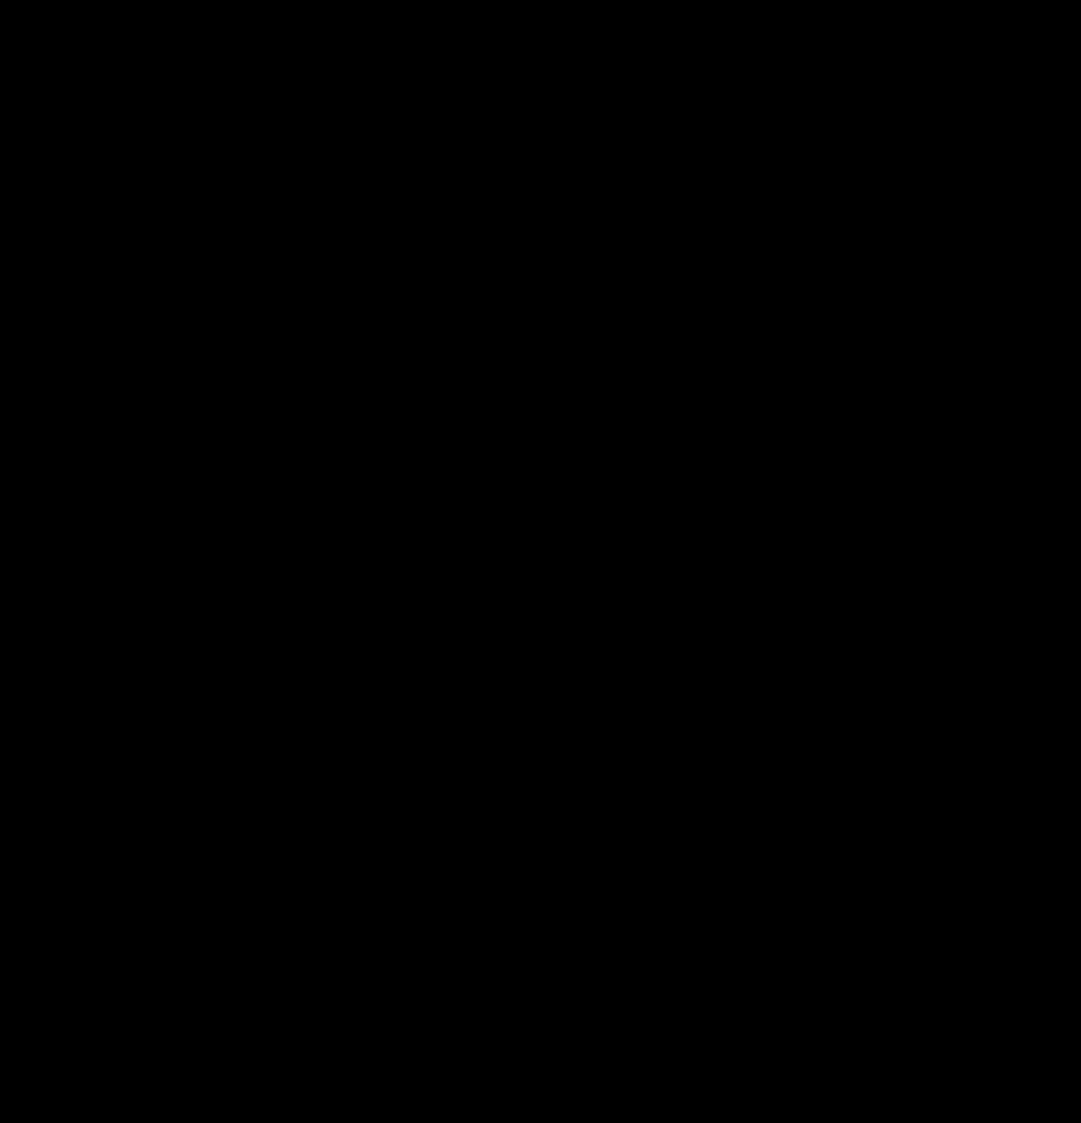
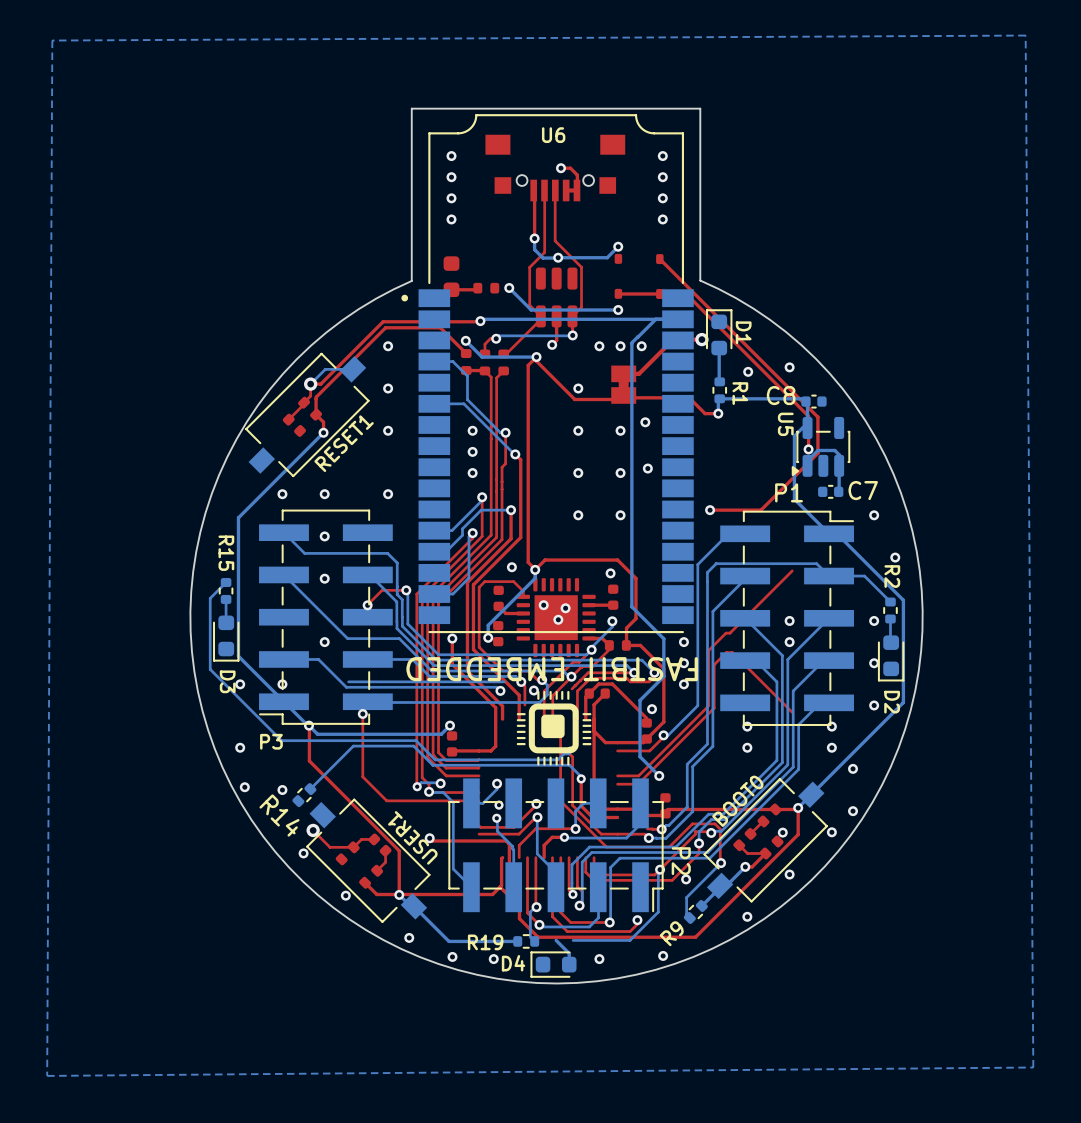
bottom zone outline: none -> (1025, 35) (1033, 1067) (47, 1075) (52, 40) (1025, 35)
via: none -> (451, 156)
via: none -> (662, 156)
part: none -> (555, 168)
top track: none -> (560, 168) (570, 168) (577, 175) (576, 190) (566, 190)
via: none -> (560, 168)
via: none -> (451, 177)
via: none -> (662, 177)
top track: none -> (533, 190) (534, 238)
top track: none -> (544, 190) (544, 252) (529, 267) (529, 305) (540, 316) (540, 319) (503, 355)
top track: none -> (555, 190) (555, 240) (581, 267) (581, 307) (572, 316) (572, 335)
via: none -> (451, 198)
via: none -> (662, 198)
via: none -> (451, 219)
via: none -> (662, 219)
bottom track: none -> (534, 238) (534, 249) (543, 258) (607, 257) (618, 246)
via: none -> (534, 238)
via: none -> (618, 246)
via: none -> (558, 257)
top track: none -> (659, 259) (817, 417) (817, 453) (761, 510) (710, 510)
part: none -> (451, 276)
part: none -> (618, 276)
part: none -> (659, 276)
board edge: none -> (411, 280) (358, 309) (326, 332) (296, 359) (257, 405) (236, 439) (219, 475) (200, 532) (193, 571) (190, 611) (191, 651) (197, 691) (214, 749) (231, 785) (251, 820) (288, 867) (333, 907) (366, 930) (401, 949) (438, 964) (477, 974) (536, 982) (577, 982) (616, 978) (655, 969) (693, 956) (747, 929) (780, 907) (810, 880) (850, 835) (872, 802) (890, 766) (905, 729) (915, 690) (921, 650) (922, 610) (919, 570) (912, 531) (893, 474) (876, 438) (854, 404) (815, 358) (770, 319) (736, 298) (700, 280) (700, 108) (411, 108) (411, 280)
top track: none -> (477, 288) (476, 289) (451, 289)
part: none -> (486, 288)
bottom track: none -> (509, 288) (531, 309) (618, 309)
via: none -> (509, 288)
top track: none -> (618, 293) (686, 293) (808, 416) (808, 449)
part: none -> (556, 297)
via: none -> (618, 309)
top track: none -> (556, 316) (556, 340) (552, 344)
bottom track: none -> (655, 319) (631, 343) (631, 606) (663, 638) (663, 676) (640, 700) (640, 756) (659, 775)
bottom track: none -> (677, 319) (482, 319) (480, 321)
top track: none -> (480, 321) (383, 321) (320, 384) (310, 384) (310, 396) (288, 419)
via: none -> (480, 321)
D1: none -> (719, 332)
bottom track: none -> (572, 335) (499, 335) (496, 338)
via: none -> (572, 335)
top track: none -> (496, 338) (490, 338) (484, 344) (484, 353)
via: none -> (496, 338)
top track: none -> (701, 339) (673, 339) (639, 373) (623, 373)
via: none -> (701, 339)
bottom track: none -> (465, 340) (482, 357) (536, 357)
via: none -> (465, 340)
via: none -> (552, 344)
via: none -> (388, 346)
via: none -> (599, 346)
via: none -> (620, 346)
via: none -> (641, 346)
bottom track: none -> (719, 348) (719, 381)
top track: none -> (466, 353) (440, 327) (385, 327) (316, 397) (316, 414) (323, 422) (323, 432)
via: none -> (536, 357)
bottom track: none -> (434, 361) (452, 361) (467, 376) (467, 399) (500, 432) (505, 432)
part: none -> (466, 362)
part: none -> (484, 362)
part: none -> (503, 362)
via: none -> (789, 367)
bottom track: none -> (352, 369) (325, 369) (310, 384)
top track: none -> (466, 370) (484, 370) (491, 377) (491, 535) (427, 598) (428, 757)
top track: none -> (503, 370) (496, 378) (496, 537) (433, 600) (433, 755)
via: none -> (748, 371)
U6: none -> (547, 373)
via: none -> (310, 384)
part: none -> (623, 384)
via: none -> (388, 388)
via: none -> (578, 388)
R1: none -> (719, 390)
C8: none -> (813, 401)
bottom track: none -> (434, 403) (463, 403) (515, 454)
part: none -> (310, 408)
top track: none -> (718, 413) (705, 413) (689, 397) (574, 399) (536, 361) (536, 357) (528, 365) (528, 562) (535, 569) (535, 573)
bottom track: none -> (718, 413) (719, 398) (803, 398) (807, 403) (807, 427) (802, 427) (794, 436) (794, 499) (829, 533) (836, 533) (903, 600) (903, 702) (798, 807)
via: none -> (718, 413)
RESET1: none -> (307, 414)
via: none -> (645, 422)
part: none -> (294, 425)
via: none -> (388, 430)
via: none -> (472, 430)
via: none -> (578, 430)
via: none -> (620, 430)
bottom track: none -> (323, 432) (238, 517) (238, 656) (317, 734) (441, 734) (450, 725)
via: none -> (323, 432)
top track: none -> (505, 432) (505, 463) (502, 467) (502, 539) (438, 603) (438, 752) (446, 760) (479, 759)
via: none -> (505, 432)
U5: none -> (821, 446)
via: none -> (808, 449)
via: none -> (472, 451)
top track: none -> (515, 454) (520, 459) (520, 537) (473, 584) (473, 649) (519, 695) (519, 719)
via: none -> (515, 454)
bottom track: none -> (807, 460) (817, 450) (834, 450) (839, 454) (838, 491)
via: none -> (647, 468)
via: none -> (472, 473)
via: none -> (578, 473)
via: none -> (620, 473)
C7: none -> (830, 491)
via: none -> (282, 494)
via: none -> (324, 494)
via: none -> (388, 494)
top track: none -> (482, 497) (482, 536) (422, 596) (422, 777) (429, 784) (429, 792) (479, 792)
bottom track: none -> (482, 497) (482, 500) (451, 530) (434, 530)
via: none -> (482, 497)
top track: none -> (511, 510) (511, 538) (467, 582) (467, 671) (502, 706) (502, 719)
bottom track: none -> (511, 510) (481, 510) (462, 528) (462, 535) (446, 551) (434, 551)
via: none -> (511, 510)
via: none -> (710, 510)
via: none -> (578, 515)
via: none -> (620, 515)
via: none -> (874, 515)
bottom track: none -> (283, 532) (304, 553) (387, 553) (397, 562) (397, 594) (402, 599) (402, 617)
top track: none -> (472, 533) (472, 538) (416, 594) (417, 786)
bottom track: none -> (472, 533) (469, 536) (469, 577) (452, 594) (434, 594)
via: none -> (472, 533)
bottom track: none -> (745, 533) (728, 533) (697, 564) (697, 705) (668, 735) (663, 735)
via: none -> (324, 536)
via: none -> (895, 557)
via: none -> (511, 567)
top track: none -> (535, 569) (545, 560) (617, 560) (635, 578) (635, 618) (626, 628) (626, 645)
bottom track: none -> (535, 569) (535, 578) (488, 625) (488, 637)
via: none -> (535, 569)
top track: none -> (792, 570) (730, 633) (726, 633) (708, 650) (708, 705) (638, 775) (617, 775)
via: none -> (610, 573)
bottom track: none -> (283, 574) (347, 638) (399, 638) (431, 671) (563, 671) (571, 676)
bottom track: none -> (367, 574) (396, 601) (396, 621)
bottom track: none -> (745, 576) (745, 579) (712, 611) (712, 746) (692, 766) (692, 811) (665, 838) (648, 838)
via: none -> (324, 578)
bottom track: none -> (707, 581) (707, 744) (687, 764) (687, 806) (668, 825) (661, 829)
bottom track: none -> (707, 581) (707, 572) (716, 563) (816, 563) (829, 576) (864, 576) (890, 602)
bottom track: none -> (226, 582) (210, 598) (210, 669) (281, 740) (416, 740) (435, 759) (558, 759) (563, 753) (569, 753)
R15: none -> (226, 590)
top track: none -> (406, 590) (382, 590) (367, 605)
bottom track: none -> (406, 590) (407, 624) (438, 654) (586, 654) (612, 626) (612, 621)
via: none -> (406, 590)
top track: none -> (523, 596) (523, 591) (513, 581) (484, 581) (479, 587) (479, 647) (502, 670) (528, 670) (537, 680) (542, 680)
part: none -> (613, 597)
part: none -> (498, 598)
bottom track: none -> (226, 599) (226, 622)
via: none -> (367, 605)
via: none -> (543, 605)
top track: none -> (613, 605) (589, 605)
top track: none -> (498, 606) (505, 613) (523, 613)
via: none -> (565, 608)
R2: none -> (890, 610)
P3: none -> (325, 617)
bottom track: none -> (402, 617) (402, 626) (436, 660) (641, 660) (654, 672)
part: none -> (556, 617)
bottom track: none -> (745, 618) (782, 655) (782, 762) (725, 819) (711, 819) (699, 831) (699, 843)
P1: none -> (787, 618)
bottom track: none -> (829, 618) (787, 659) (787, 764) (721, 831) (711, 832)
bottom track: none -> (890, 618) (891, 642)
via: none -> (558, 619)
via: none -> (789, 620)
via: none -> (874, 620)
bottom track: none -> (396, 621) (396, 628) (434, 665) (626, 665) (634, 672)
via: none -> (612, 621)
part: none -> (498, 633)
via: none -> (488, 637)
D3: none -> (226, 638)
top track: none -> (452, 638) (452, 664) (495, 707) (495, 746) (490, 750) (452, 751)
via: none -> (452, 638)
top track: none -> (589, 638) (602, 638) (609, 645) (609, 649) (592, 666) (580, 667) (552, 695) (552, 718)
via: none -> (324, 642)
via: none -> (683, 642)
via: none -> (789, 642)
part: none -> (617, 645)
top track: none -> (626, 645) (640, 645) (663, 668) (663, 721) (646, 739)
top track: none -> (591, 649) (579, 662) (573, 662) (544, 691) (544, 719)
via: none -> (591, 649)
D2: none -> (891, 658)
bottom track: none -> (283, 659) (318, 659) (346, 687) (496, 687) (500, 690)
bottom track: none -> (367, 659) (412, 659) (429, 676) (515, 676) (521, 681)
bottom track: none -> (745, 660) (755, 660) (776, 681) (776, 760) (723, 814) (708, 814) (675, 847) (589, 847) (571, 864) (572, 894)
bottom track: none -> (829, 660) (823, 660) (793, 691) (793, 767) (707, 852) (591, 852) (582, 862) (582, 903) (579, 905)
via: none -> (683, 663)
via: none -> (874, 663)
text: none -> FASTBIT EMBEDDED (552, 669)
top track: none -> (634, 672) (588, 672) (572, 688)
via: none -> (634, 672)
top track: none -> (654, 672) (654, 676) (649, 681) (630, 681) (626, 678) (589, 678) (577, 691) (577, 719)
via: none -> (654, 672)
via: none -> (571, 676)
bottom track: none -> (542, 680) (547, 685) (547, 694) (539, 702) (367, 701) (362, 706) (362, 713)
via: none -> (542, 680)
bottom track: none -> (504, 681) (348, 681)
via: none -> (521, 681)
via: none -> (240, 684)
via: none -> (282, 684)
via: none -> (683, 684)
top track: none -> (524, 685) (524, 705)
via: none -> (500, 690)
drawing: none -> [516, 690, 592, 766]
via: none -> (533, 690)
part: none -> (597, 693)
top track: none -> (605, 693) (594, 704) (594, 797) (605, 809) (641, 809) (647, 815) (662, 815) (668, 809) (798, 807) (798, 834) (695, 937) (538, 937) (519, 918) (519, 906) (500, 887)
bottom track: none -> (829, 702) (820, 702) (798, 724) (798, 769) (709, 858) (619, 858) (610, 867) (609, 922)
via: none -> (874, 705)
via: none -> (652, 709)
top track: none -> (792, 712) (732, 652) (726, 652) (714, 664) (714, 708) (638, 784) (617, 784)
top track: none -> (362, 713) (362, 776) (386, 800) (479, 800)
via: none -> (362, 713)
top track: none -> (646, 718) (612, 684) (598, 684) (585, 697) (585, 719)
top track: none -> (560, 719) (560, 801) (606, 847) (669, 847) (692, 823) (714, 823) (720, 829) (721, 863)
top track: none -> (308, 725) (309, 760) (399, 850) (399, 894)
via: none -> (308, 725)
via: none -> (450, 725)
via: none -> (747, 726)
via: none -> (831, 726)
top track: none -> (594, 731) (605, 742) (643, 742) (646, 739)
part: none -> (646, 731)
top track: none -> (663, 735) (649, 750) (617, 750)
via: none -> (663, 735)
part: none -> (452, 743)
via: none -> (240, 747)
via: none -> (747, 747)
via: none -> (831, 747)
top track: none -> (569, 753) (572, 756) (572, 805) (601, 834) (644, 834) (648, 838)
top track: none -> (433, 755) (446, 768) (479, 767)
top track: none -> (428, 758) (446, 775) (479, 775)
via: none -> (853, 768)
via: none -> (659, 775)
top track: none -> (581, 778) (581, 806) (592, 817) (617, 817)
bottom track: none -> (581, 778) (569, 765) (432, 765) (413, 746) (353, 746) (310, 789)
via: none -> (581, 778)
bottom track: none -> (440, 782) (421, 782) (417, 786)
via: none -> (440, 783)
via: none -> (497, 783)
bottom track: none -> (496, 785) (495, 783) (497, 789) (482, 803) (471, 803)
via: none -> (417, 786)
via: none -> (244, 787)
via: none -> (282, 790)
bottom track: none -> (429, 791) (443, 792) (453, 802) (453, 869) (471, 887)
via: none -> (429, 791)
R14: none -> (304, 795)
top track: none -> (536, 803) (513, 827) (480, 827) (479, 825)
via: none -> (536, 803)
bottom track: none -> (598, 803) (583, 803) (575, 811) (575, 828)
bottom track: none -> (640, 803) (640, 824) (626, 838) (564, 837)
via: none -> (499, 805)
part: none -> (665, 805)
via: none -> (798, 807)
via: none -> (853, 811)
part: none -> (769, 815)
top track: none -> (537, 817) (518, 834) (479, 834)
bottom track: none -> (537, 817) (537, 853) (555, 872) (555, 887)
via: none -> (537, 817)
bottom track: none -> (496, 818) (497, 831) (513, 849) (513, 887)
via: none -> (496, 818)
top track: none -> (763, 821) (750, 833)
top track: none -> (575, 828) (535, 828) (519, 845) (519, 857)
via: none -> (575, 828)
top track: none -> (647, 829) (657, 829) (659, 826) (661, 829)
via: none -> (661, 829)
top track: none -> (313, 830) (330, 847) (353, 847) (361, 839) (374, 839)
via: none -> (313, 830)
top track: none -> (711, 832) (695, 831) (695, 834) (654, 874) (596, 874) (594, 872) (594, 857)
via: none -> (711, 832)
via: none -> (782, 832)
via: none -> (831, 832)
top track: none -> (564, 837) (552, 837) (544, 845) (544, 857)
via: none -> (564, 837)
top track: none -> (429, 838) (432, 840) (506, 840) (509, 844) (509, 880) (516, 887)
via: none -> (429, 838)
via: none -> (648, 838)
part: none -> (744, 839)
BOOT0: none -> (765, 840)
top track: none -> (699, 843) (699, 853) (672, 880) (593, 880) (585, 872) (585, 857)
via: none -> (699, 843)
part: none -> (379, 845)
P2: none -> (555, 845)
top track: none -> (739, 845) (747, 853) (765, 853) (752, 866) (745, 866)
part: none -> (771, 847)
top track: none -> (385, 850) (385, 862) (377, 870)
via: none -> (303, 853)
part: none -> (347, 853)
top track: none -> (502, 857) (501, 885) (492, 894) (376, 894) (365, 882)
top track: none -> (527, 857) (527, 912) (539, 924)
top track: none -> (535, 857) (536, 907)
top track: none -> (552, 857) (552, 916) (567, 931) (630, 931) (637, 924) (637, 920)
top track: none -> (560, 857) (560, 912) (570, 922) (609, 922)
top track: none -> (569, 857) (569, 890) (572, 894)
top track: none -> (577, 857) (577, 886) (582, 891) (582, 902) (579, 905)
USER1: none -> (368, 860)
bottom track: none -> (721, 863) (686, 897) (686, 914) (689, 917)
via: none -> (721, 863)
bottom track: none -> (745, 866) (726, 885) (720, 885) (701, 905)
via: none -> (745, 866)
bottom track: none -> (660, 869) (658, 871) (658, 912) (629, 940) (573, 940)
via: none -> (660, 869)
via: none -> (789, 874)
part: none -> (371, 876)
via: none -> (686, 879)
bottom track: none -> (598, 887) (598, 917) (589, 926) (541, 926) (539, 924)
bottom track: none -> (399, 894) (410, 906) (413, 906) (449, 941) (517, 941)
via: none -> (399, 894)
via: none -> (572, 894)
via: none -> (345, 895)
via: none -> (579, 905)
bottom track: none -> (536, 907) (530, 911) (530, 937) (534, 941)
via: none -> (536, 907)
R9: none -> (695, 911)
via: none -> (747, 916)
via: none -> (637, 920)
via: none -> (609, 922)
via: none -> (539, 924)
via: none -> (409, 937)
bottom track: none -> (556, 940) (569, 953) (569, 964)
R19: none -> (526, 941)
via: none -> (663, 955)
via: none -> (452, 956)
via: none -> (493, 959)
via: none -> (599, 959)
D4: none -> (553, 964)

